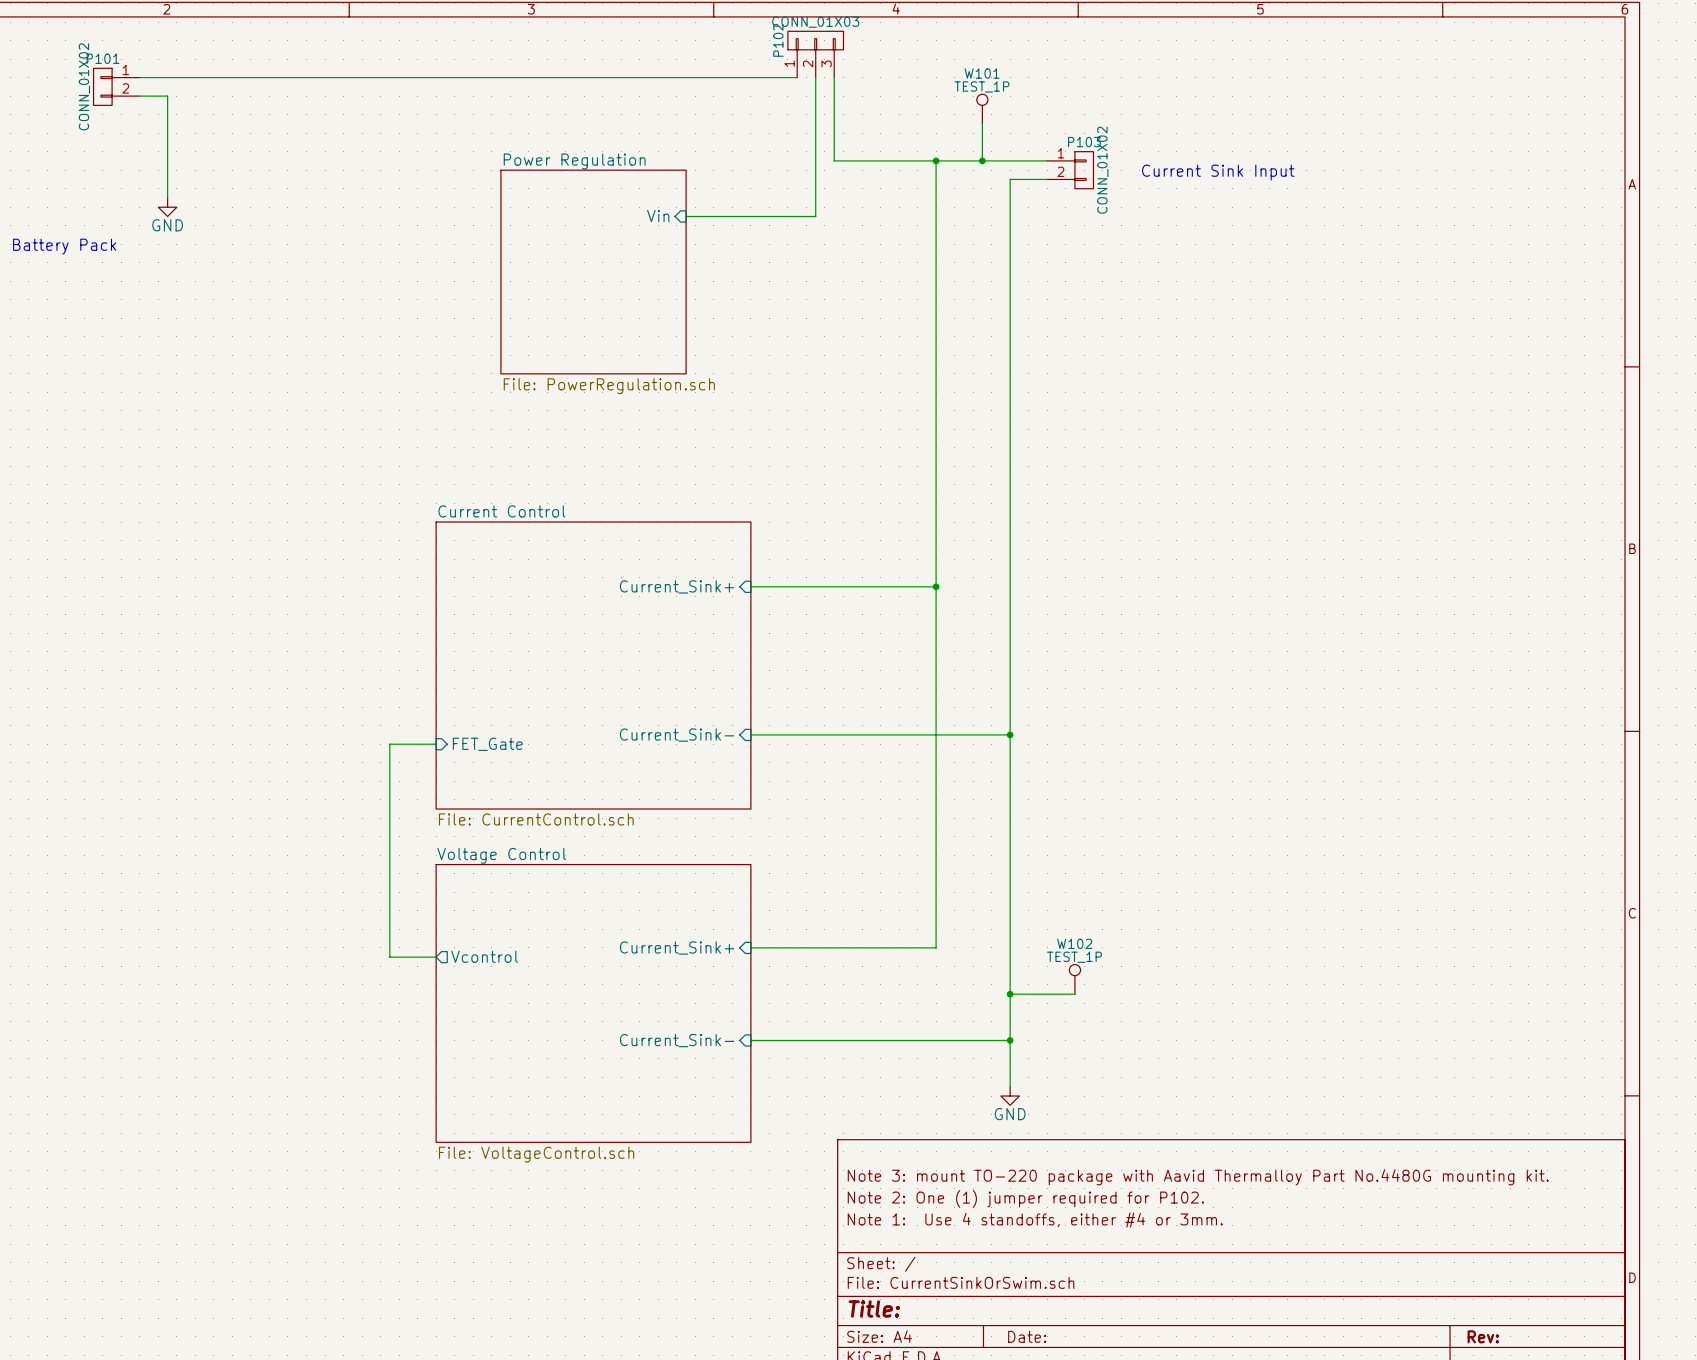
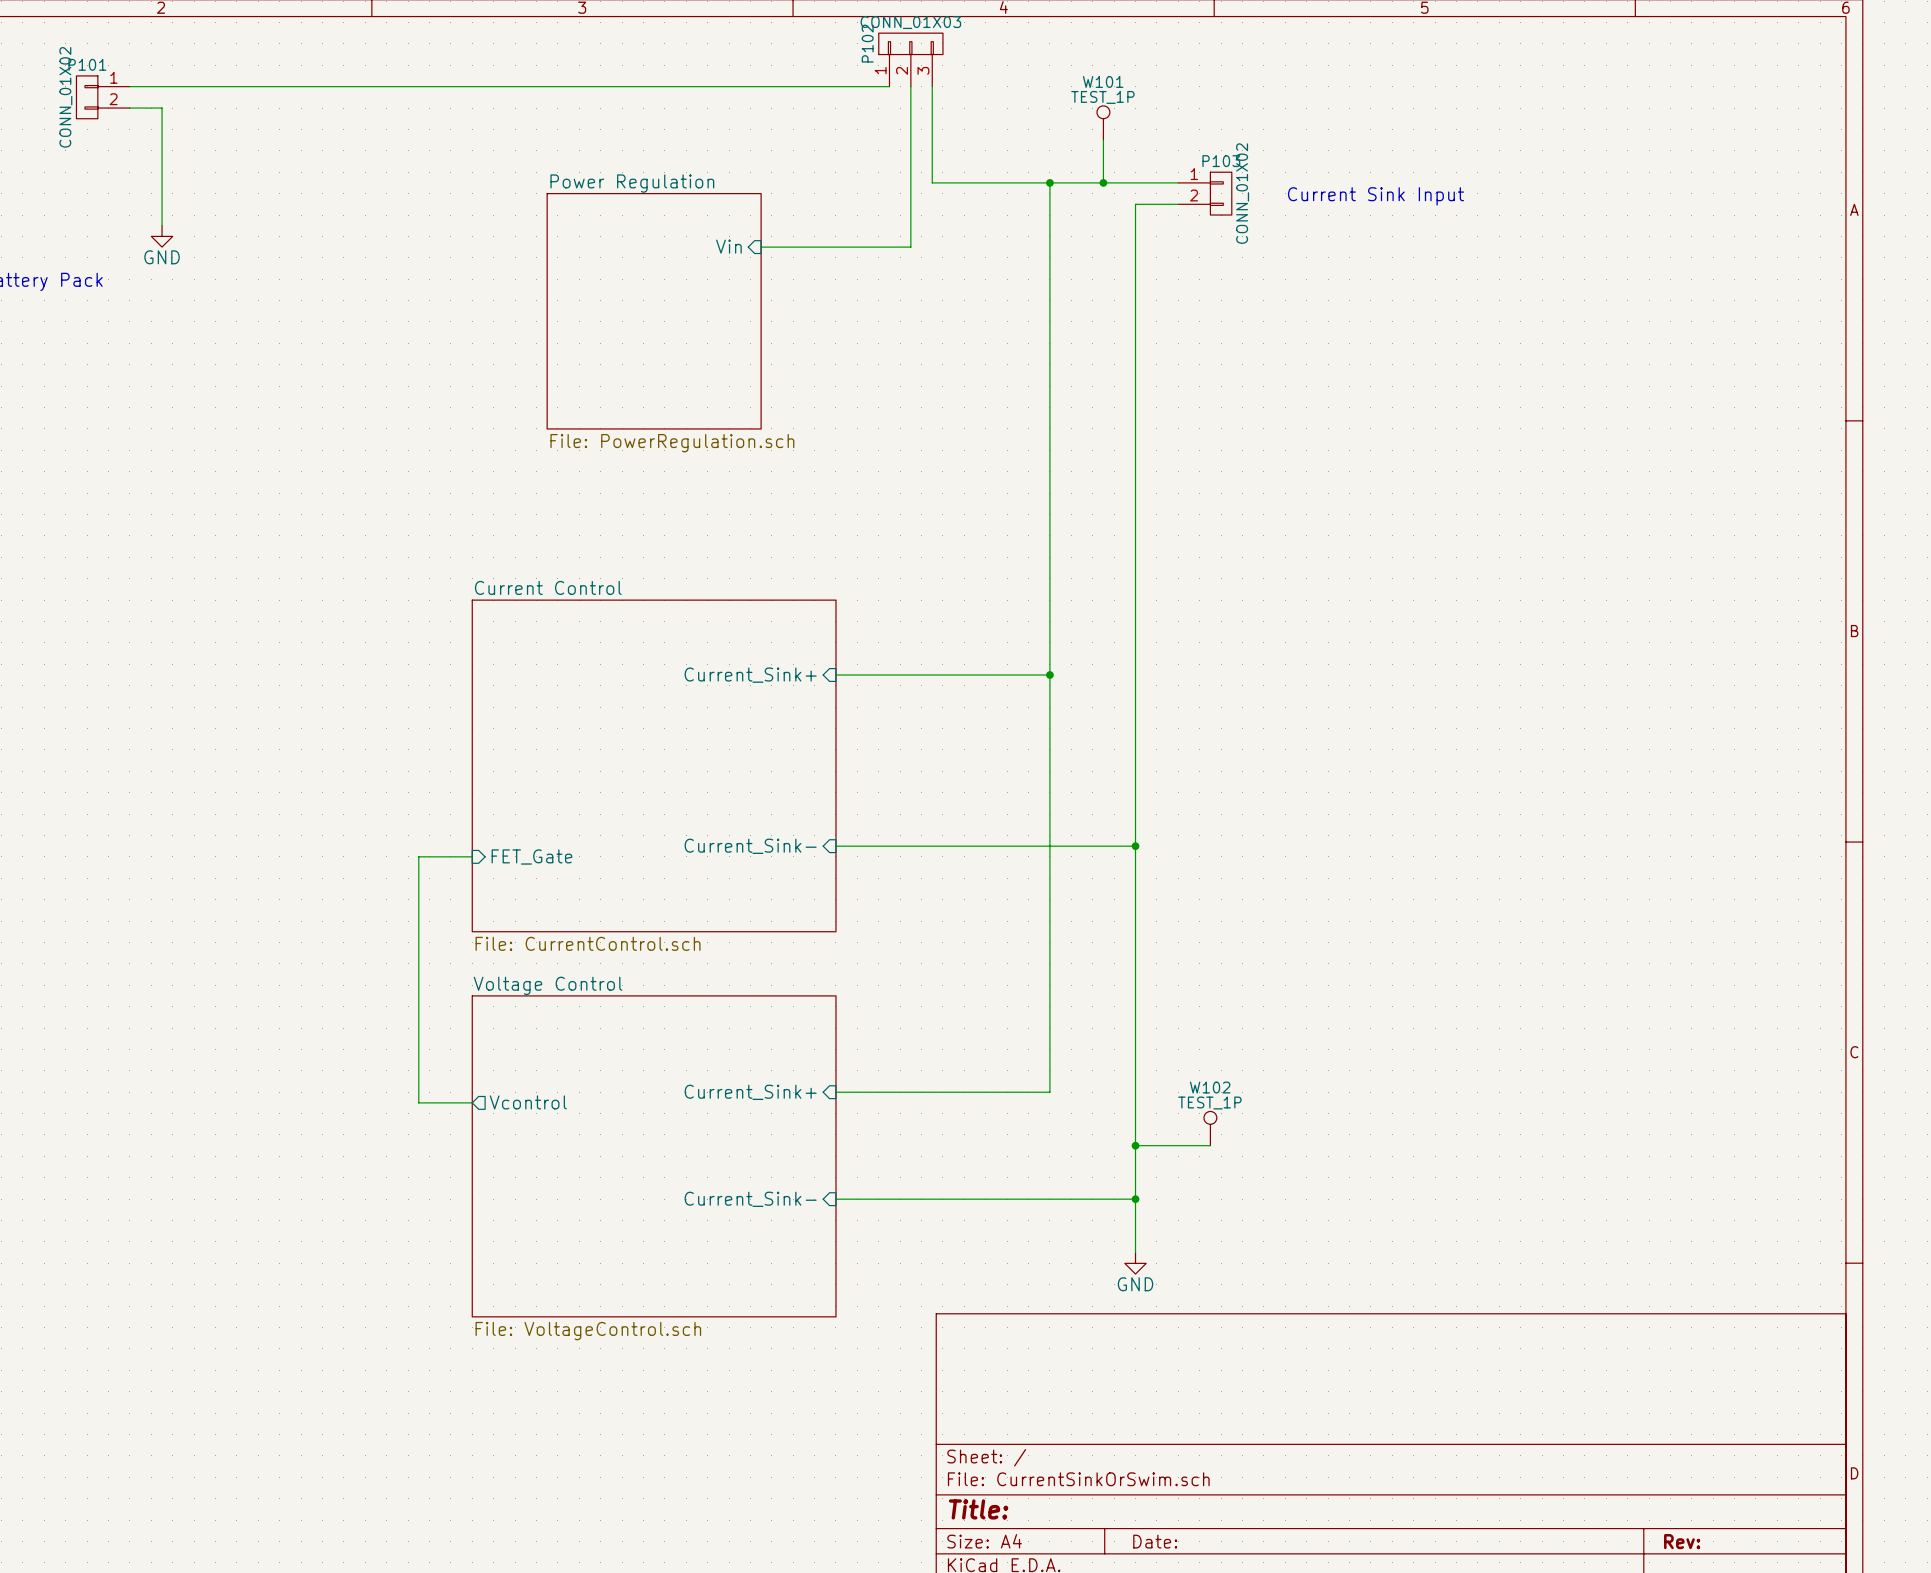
title block: Note 3: mount TO-220 package with Aavid Thermalloy Part No.4480G mounting kit. (1198, 1177) -> none
title block: Note 2: One (1) jumper required for P102. (1025, 1198) -> none
title block: Note 1: Use 4 standoffs, either #4 or 3mm. (1035, 1219) -> none

